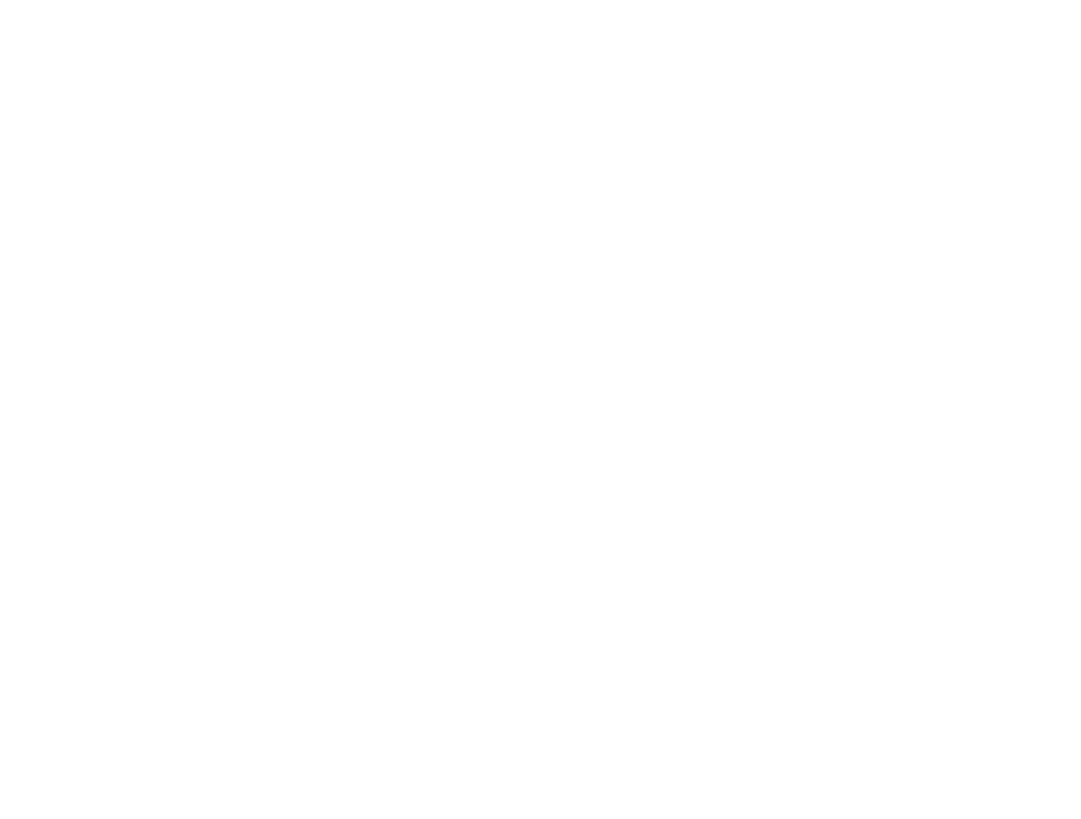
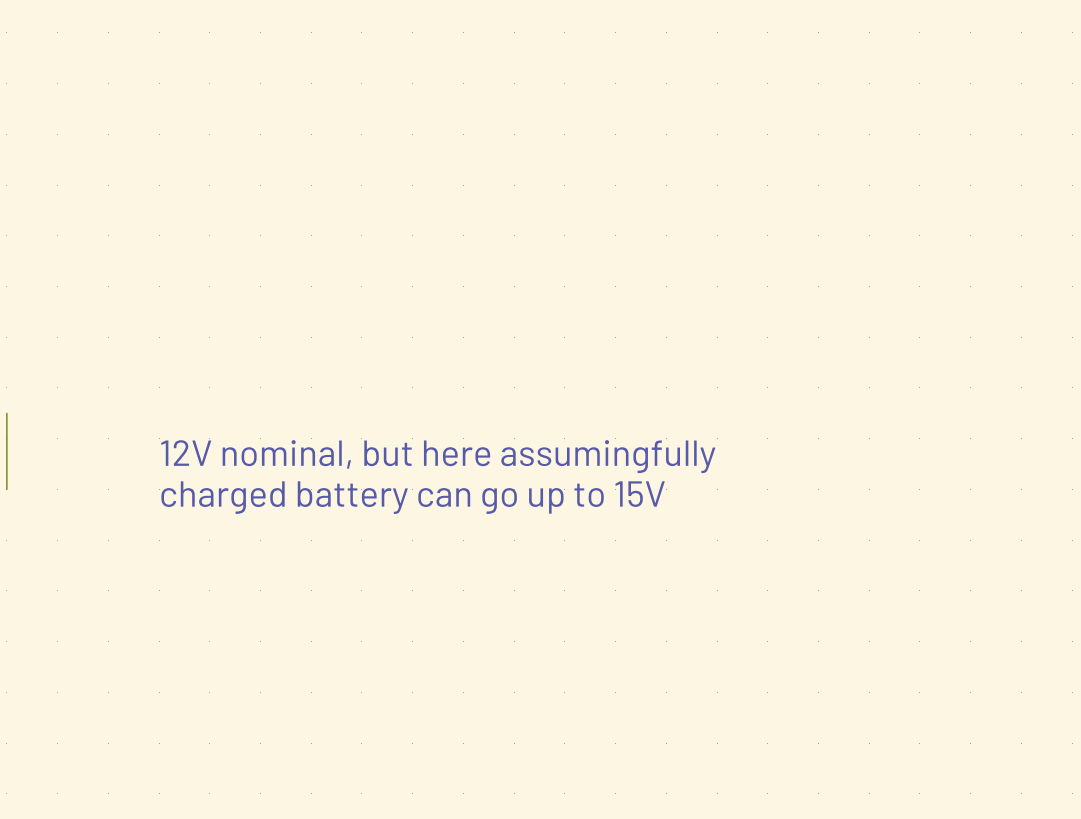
wire: none -> (6, 413) (6, 489)
text: none -> 12V nominal, but here assumingfully (438, 456)
text: none -> charged battery can go up to 15V (413, 497)

